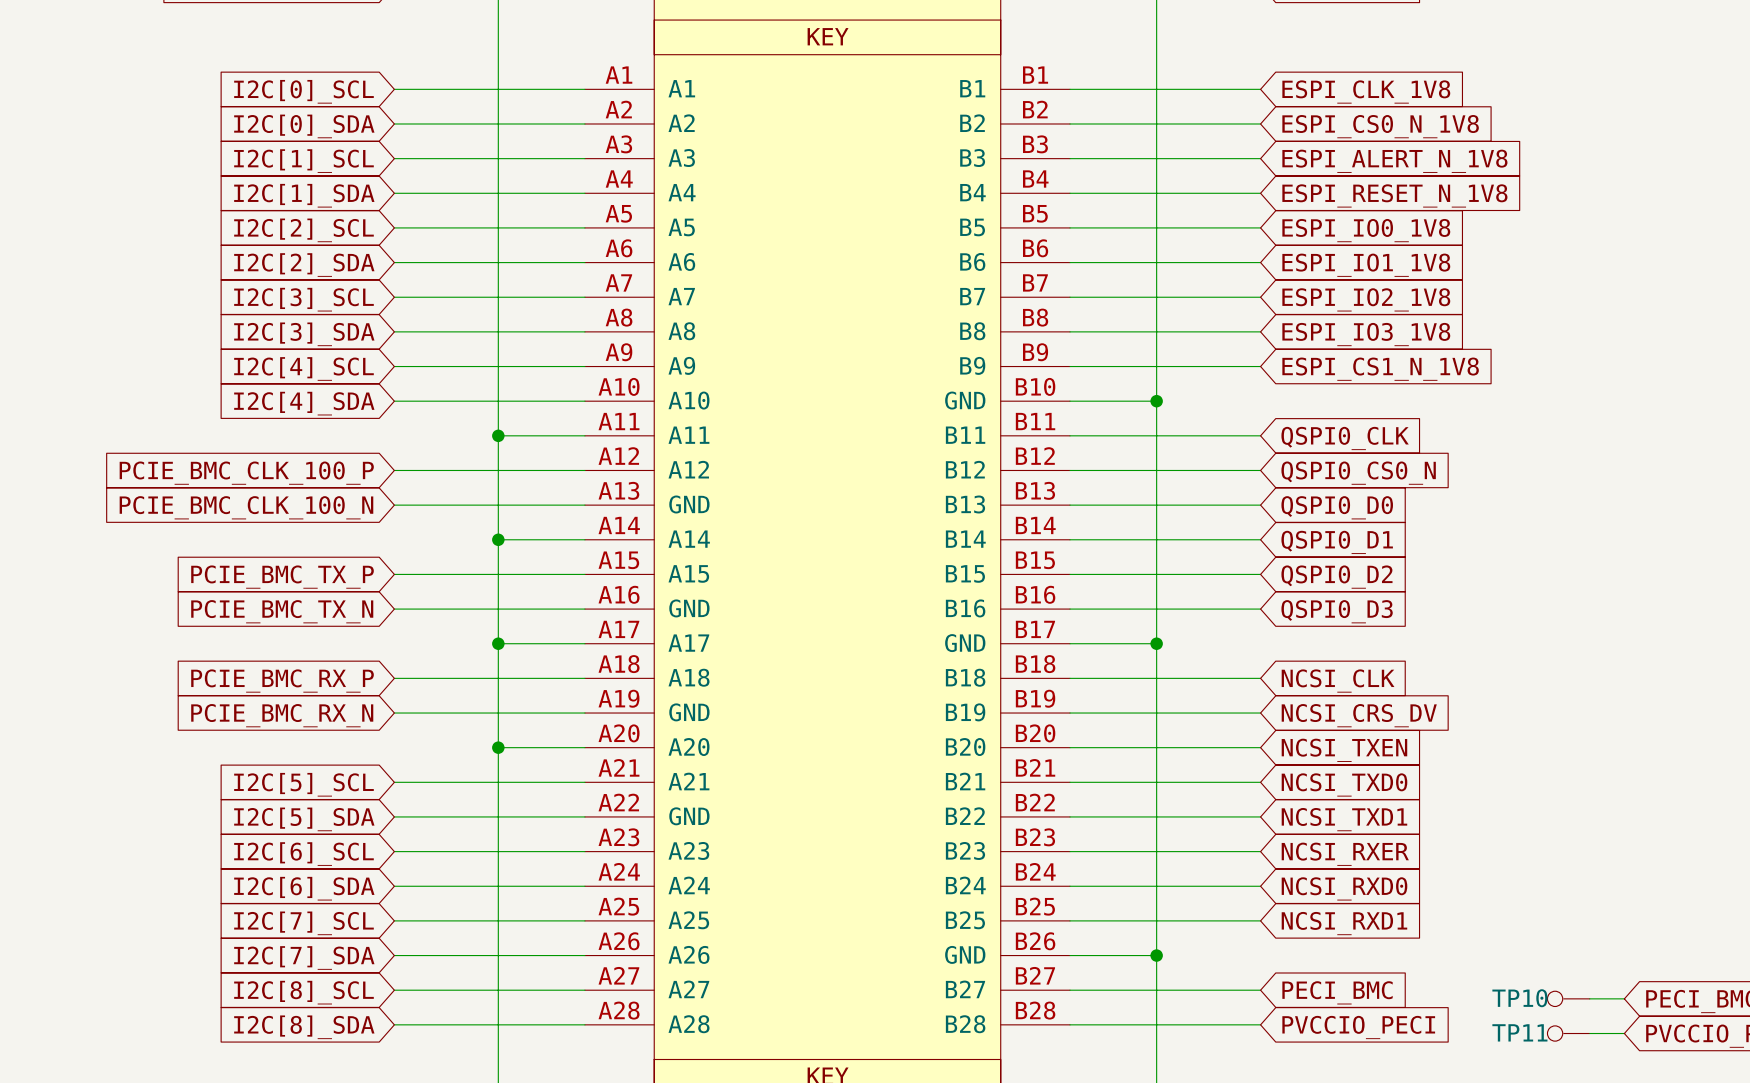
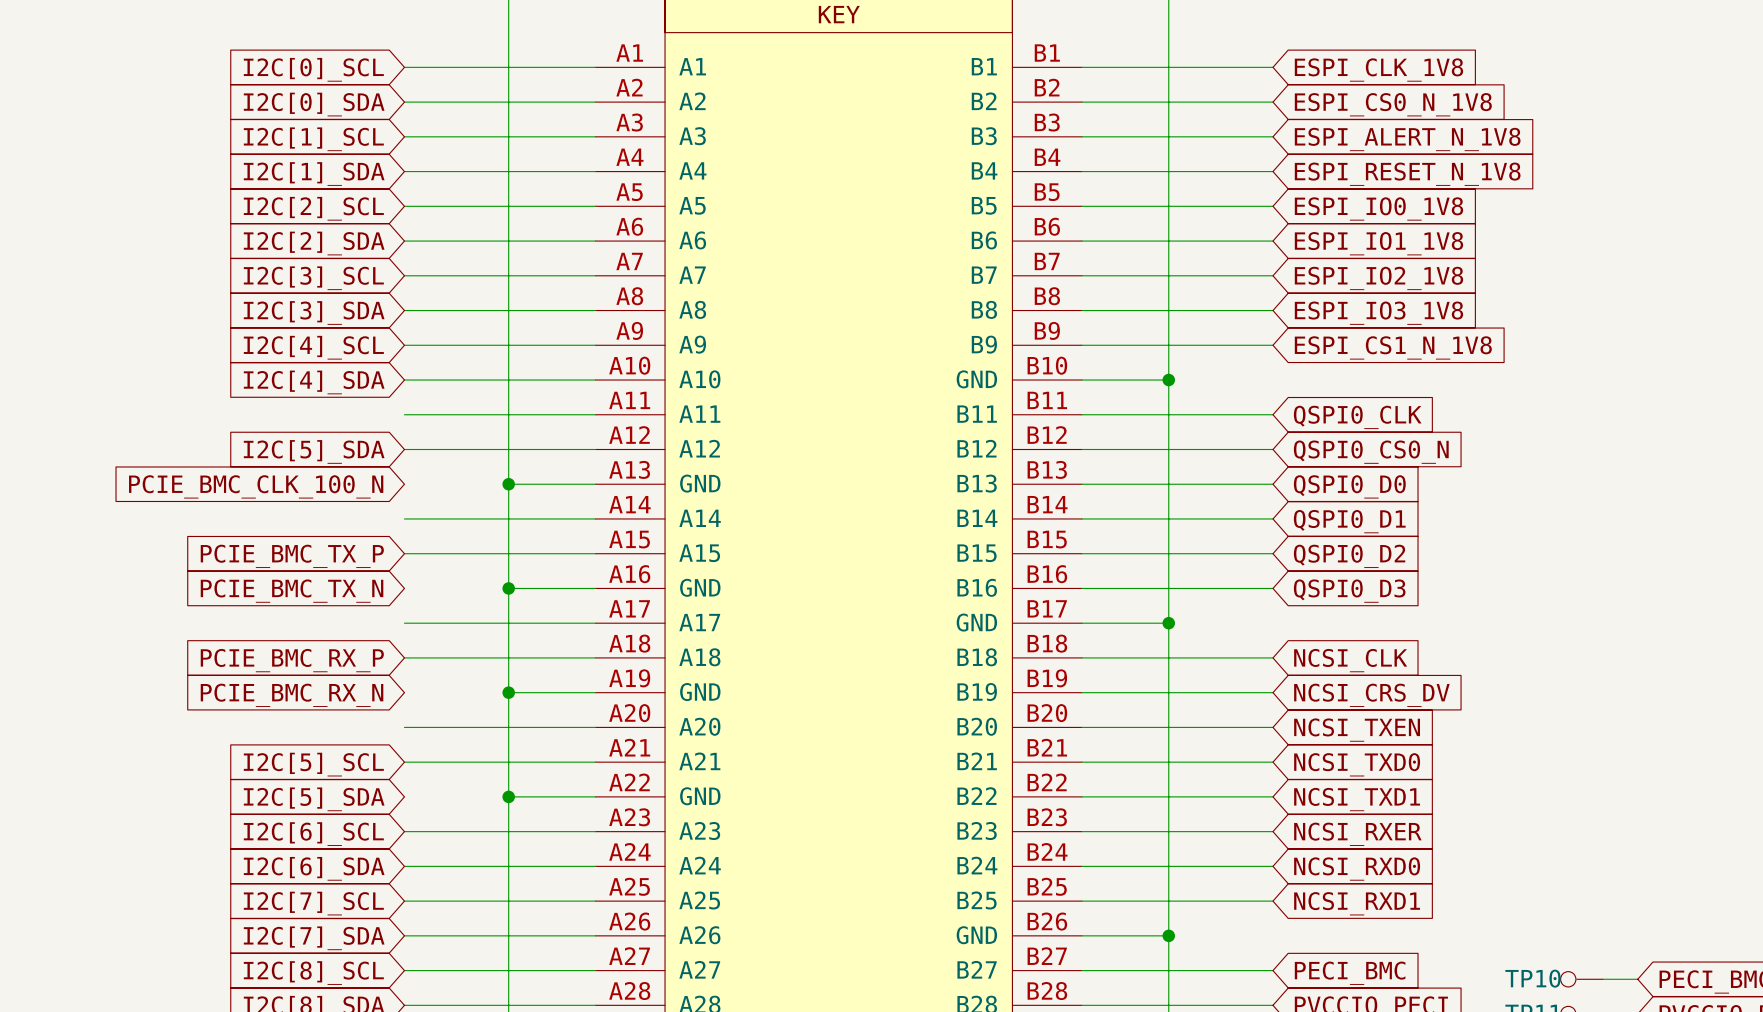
junction: (498, 435) -> none
global label: PCIE_BMC_CLK_100_P (246, 473) -> I2C[5]_SDA (314, 451)
wire: (394, 505) (498, 505) -> (404, 414) (508, 414)
junction: none -> (508, 484)
junction: (498, 539) -> none
wire: (394, 609) (498, 609) -> (404, 518) (508, 518)
junction: none -> (508, 588)
junction: (498, 643) -> none
wire: (394, 713) (498, 713) -> (404, 623) (508, 623)
junction: none -> (508, 692)
junction: (498, 747) -> none
wire: (394, 816) (498, 816) -> (404, 727) (508, 727)
junction: none -> (508, 796)

